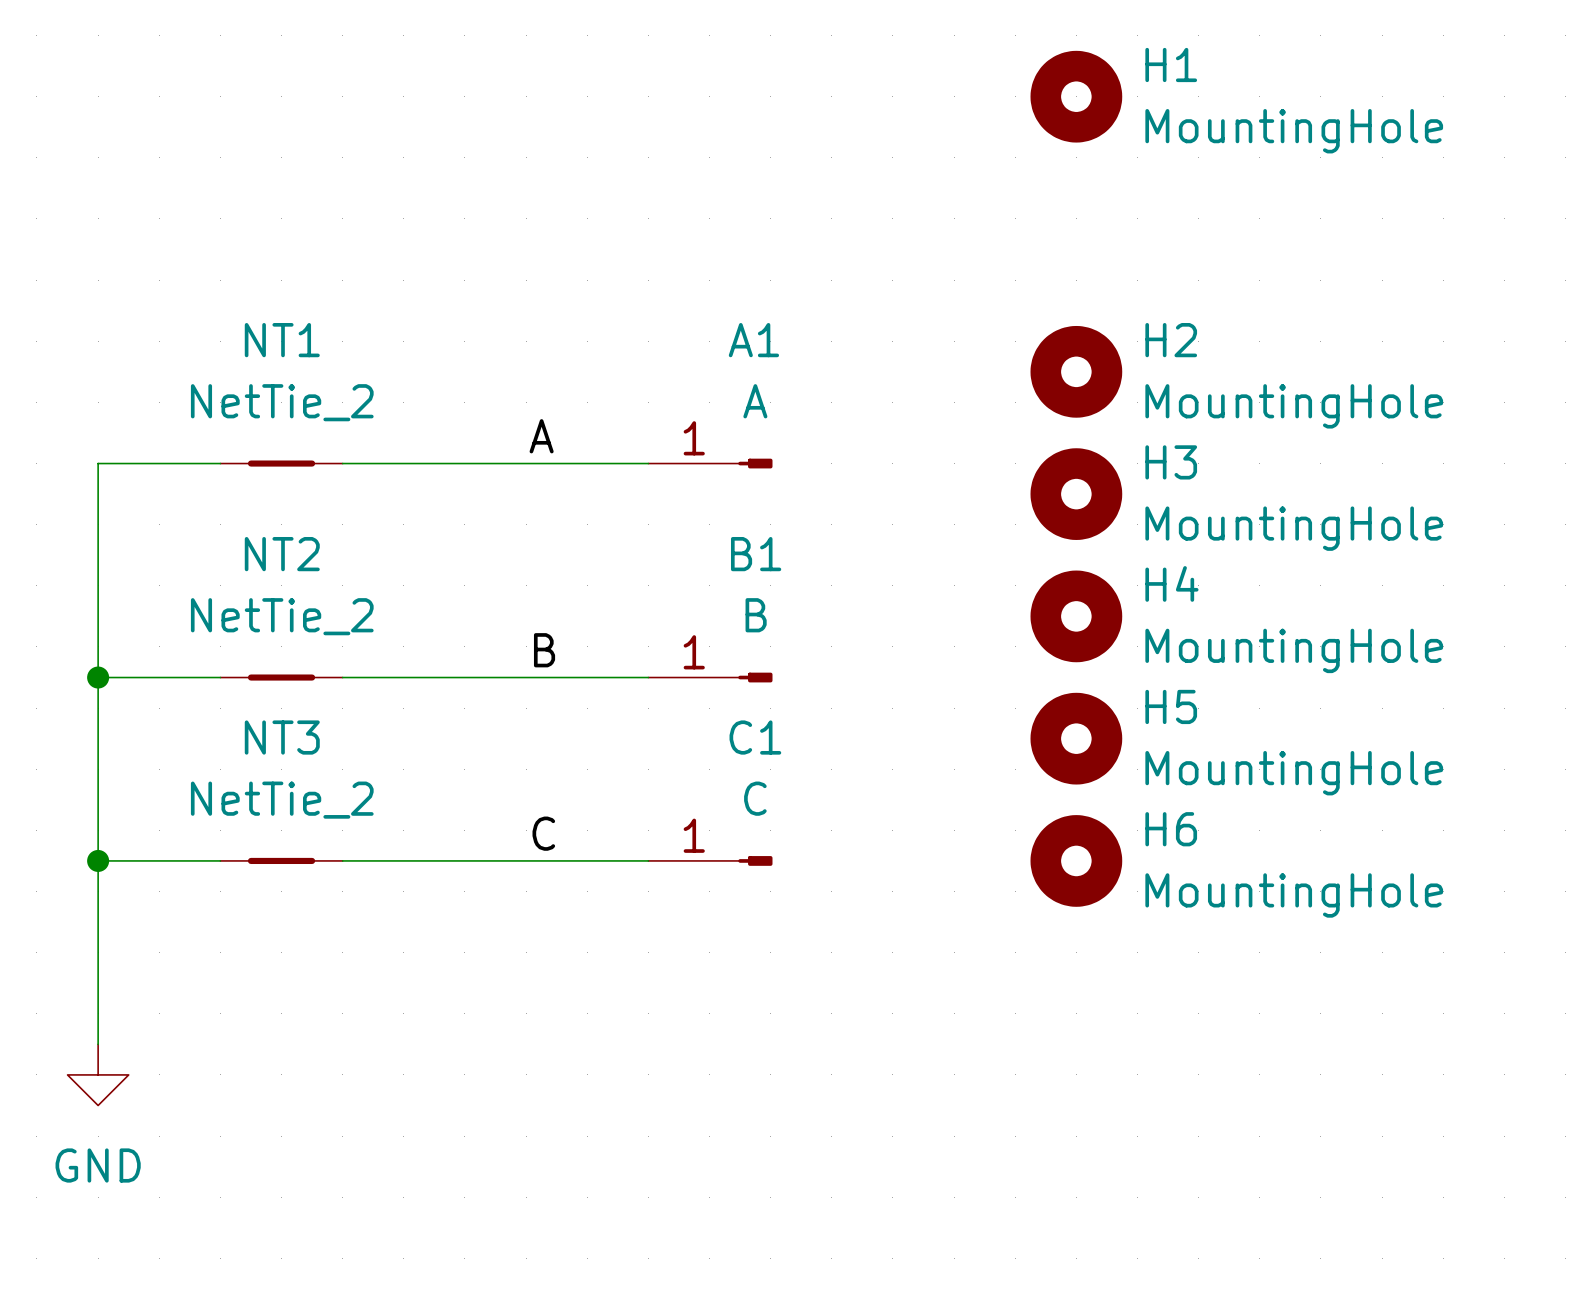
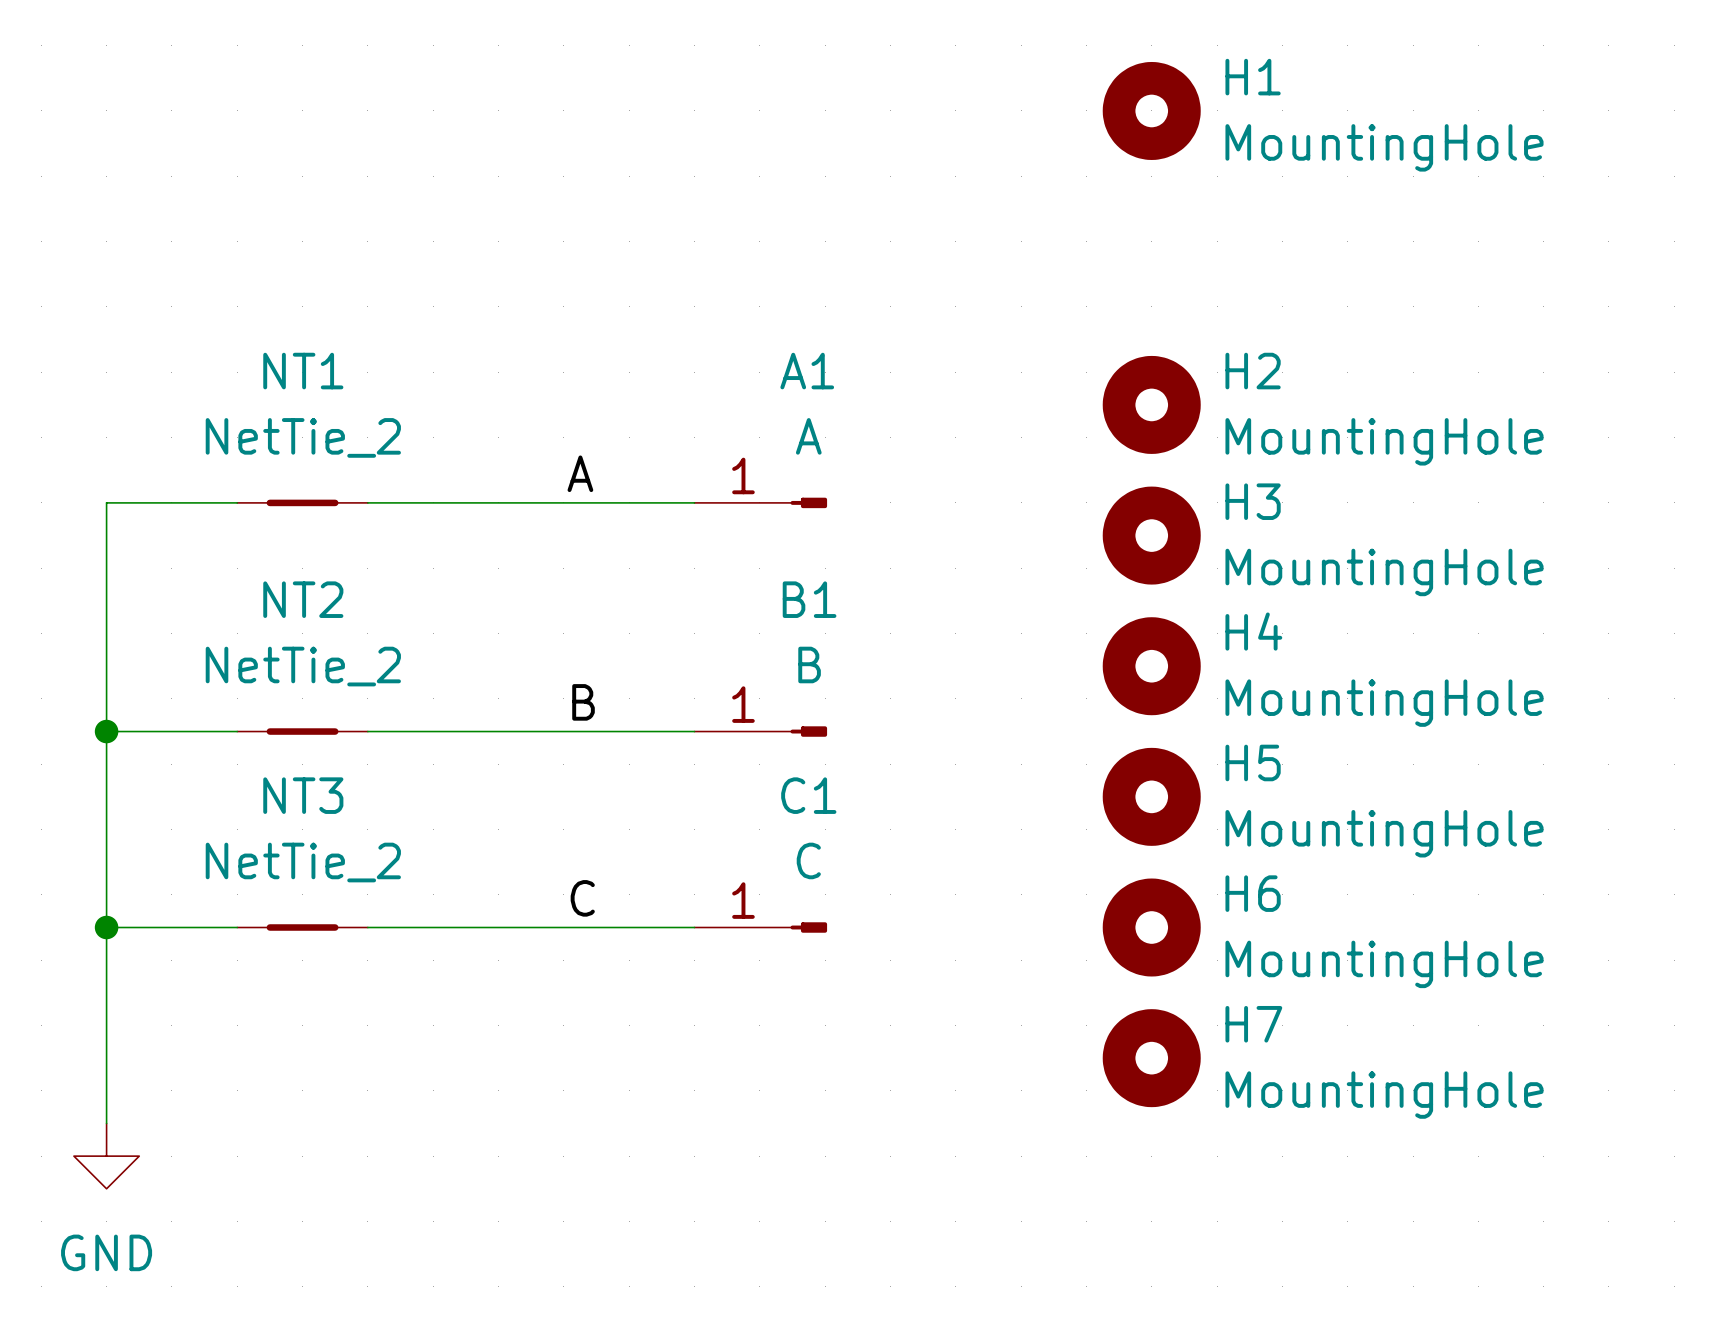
H7: none -> MountingHole (1151, 1058)

